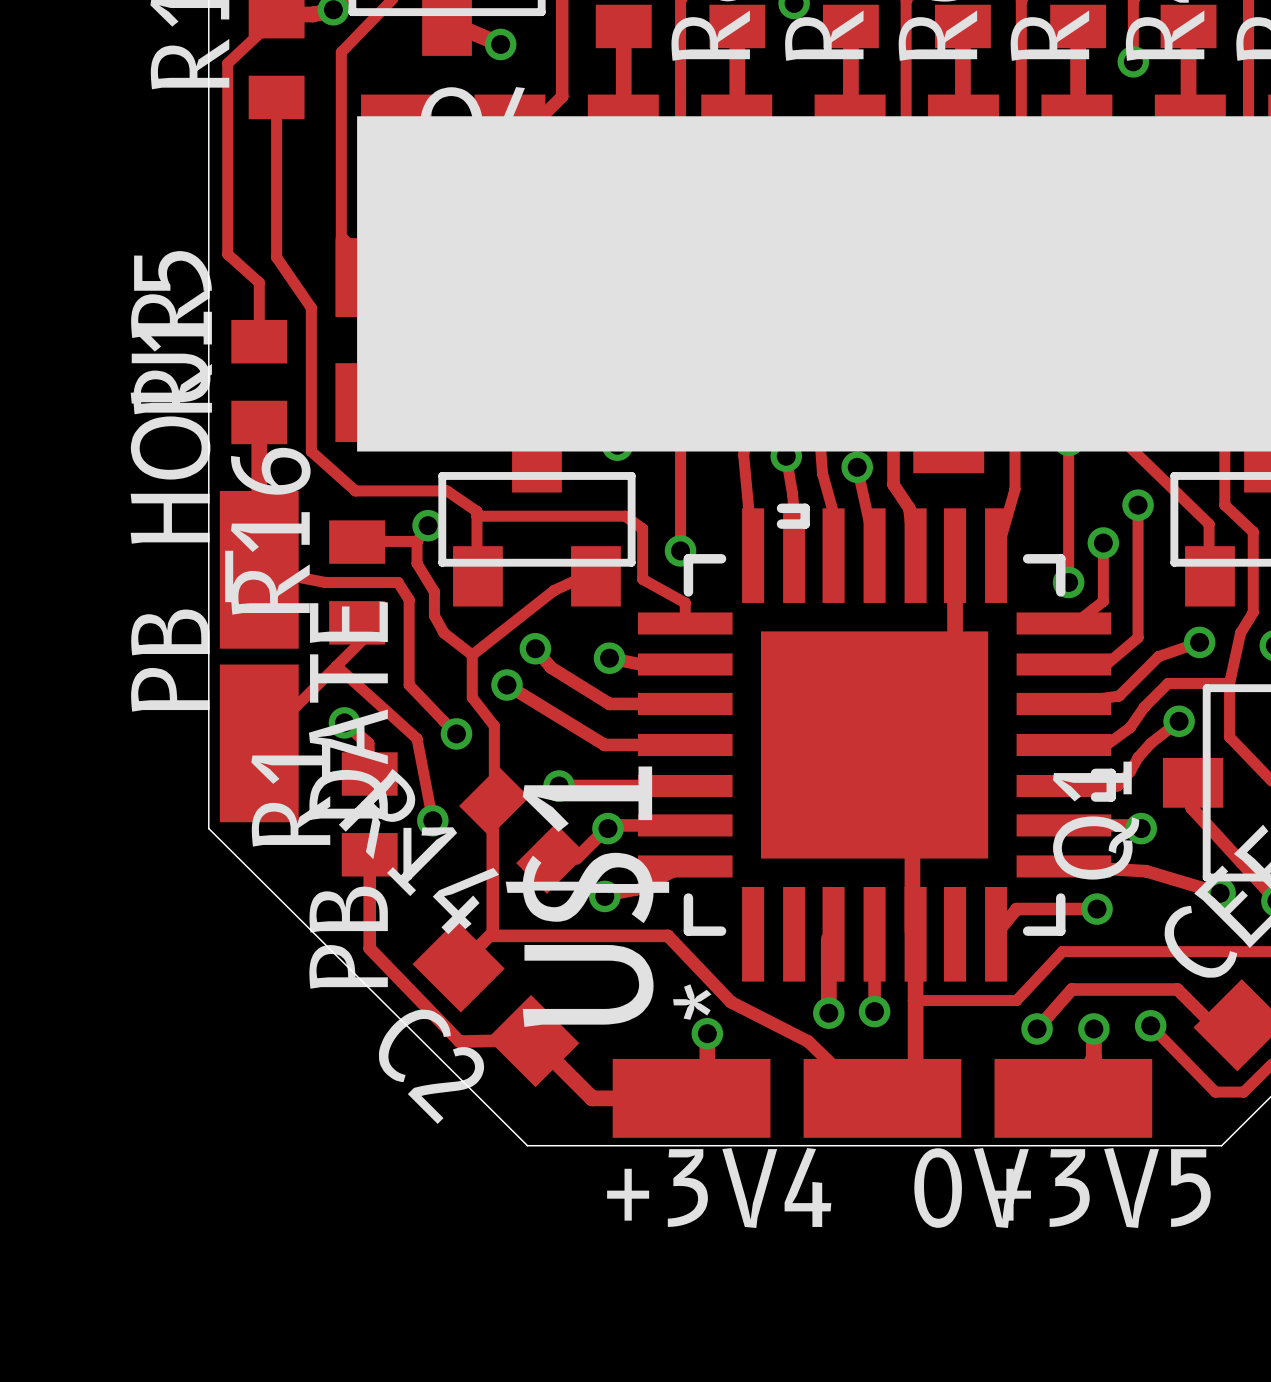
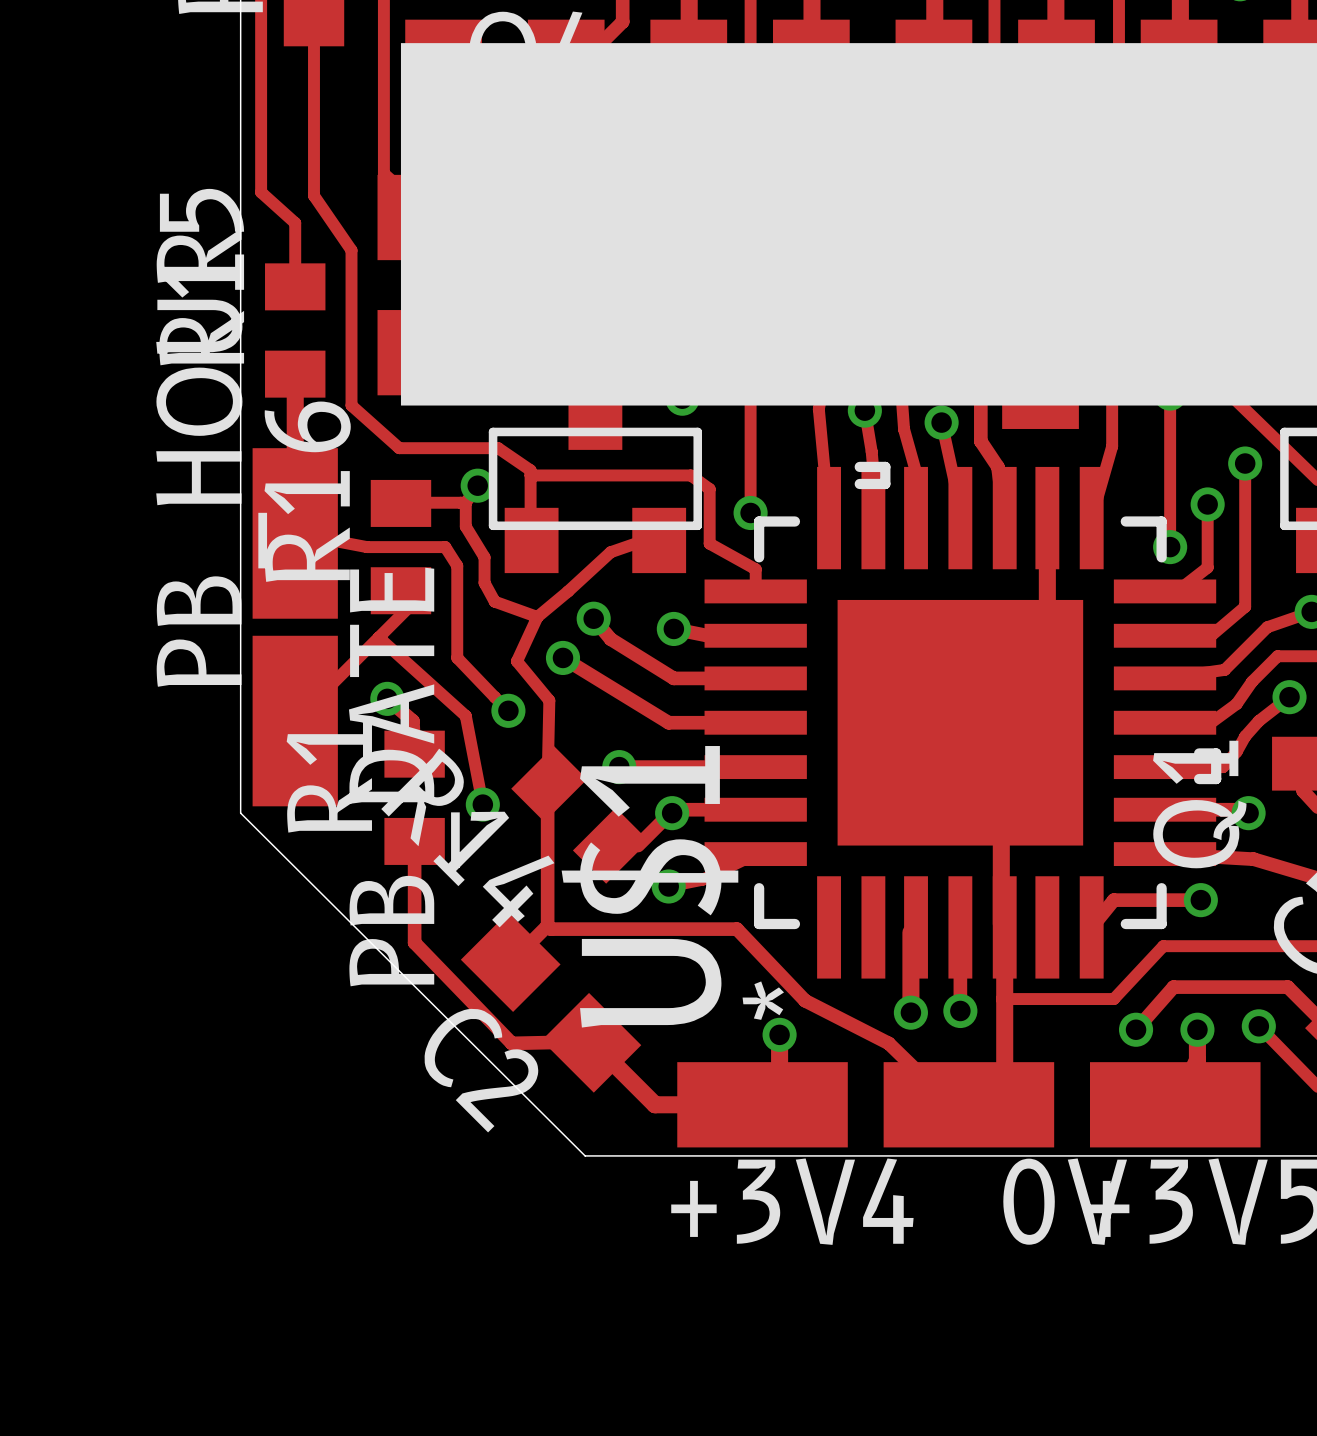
track: (592, 573) (554, 590) (472, 655) -> (655, 536) (610, 552) (537, 617)
track: (443, 632) (472, 655) -> (494, 601) (537, 617)
track: (472, 655) (472, 697) (494, 726) (494, 801) -> (537, 617) (516, 661) (549, 700) (547, 779) (549, 783)

